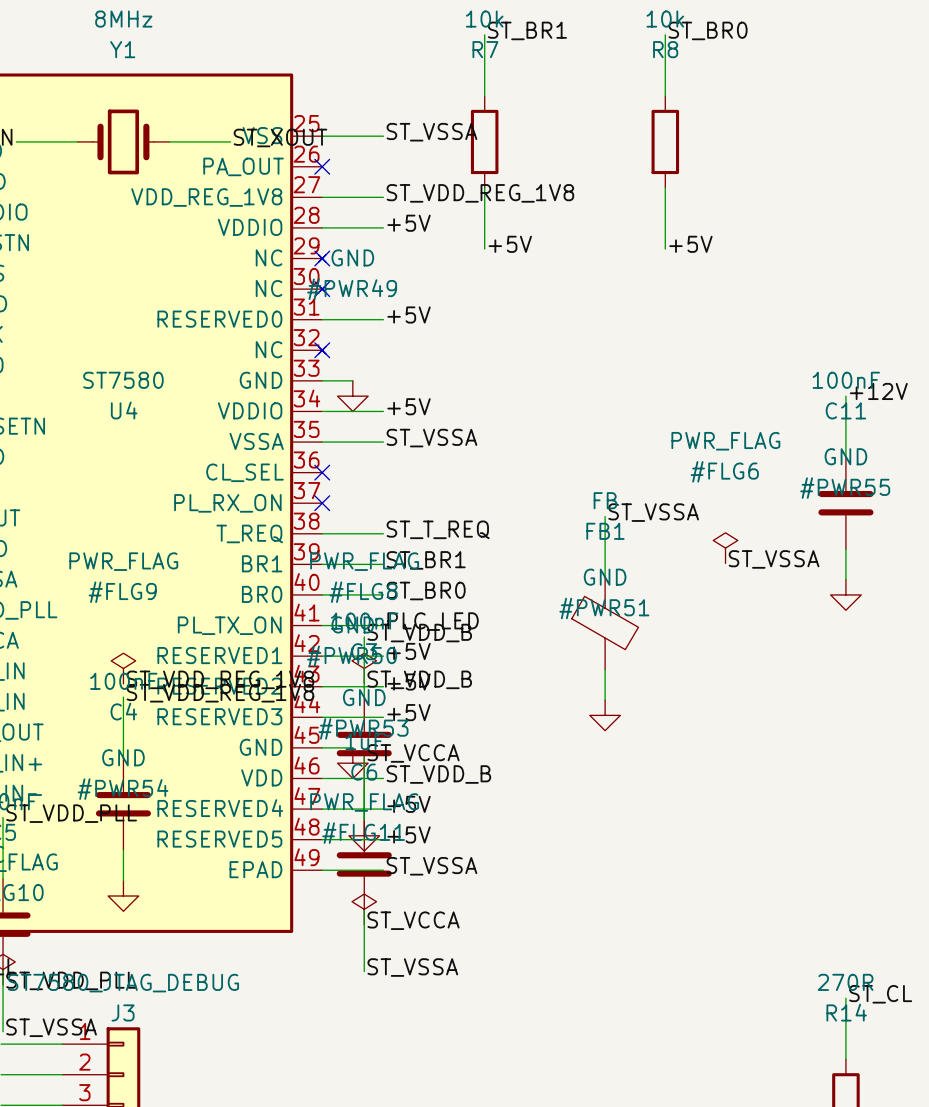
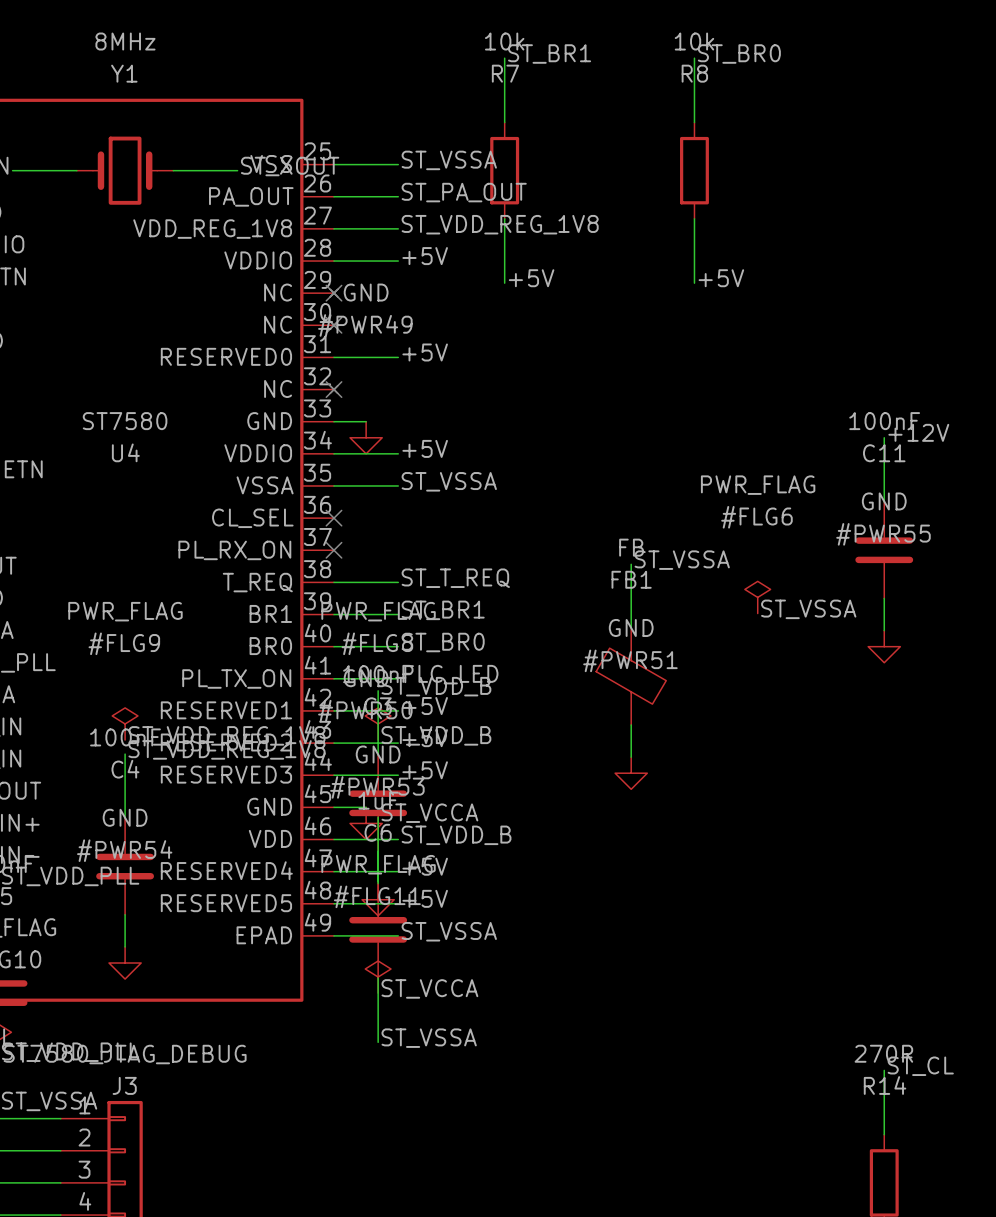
label: none -> ST_PA_OUT (464, 192)
wire: none -> (333, 196) (398, 196)
no-connect mark: (322, 166) -> none

